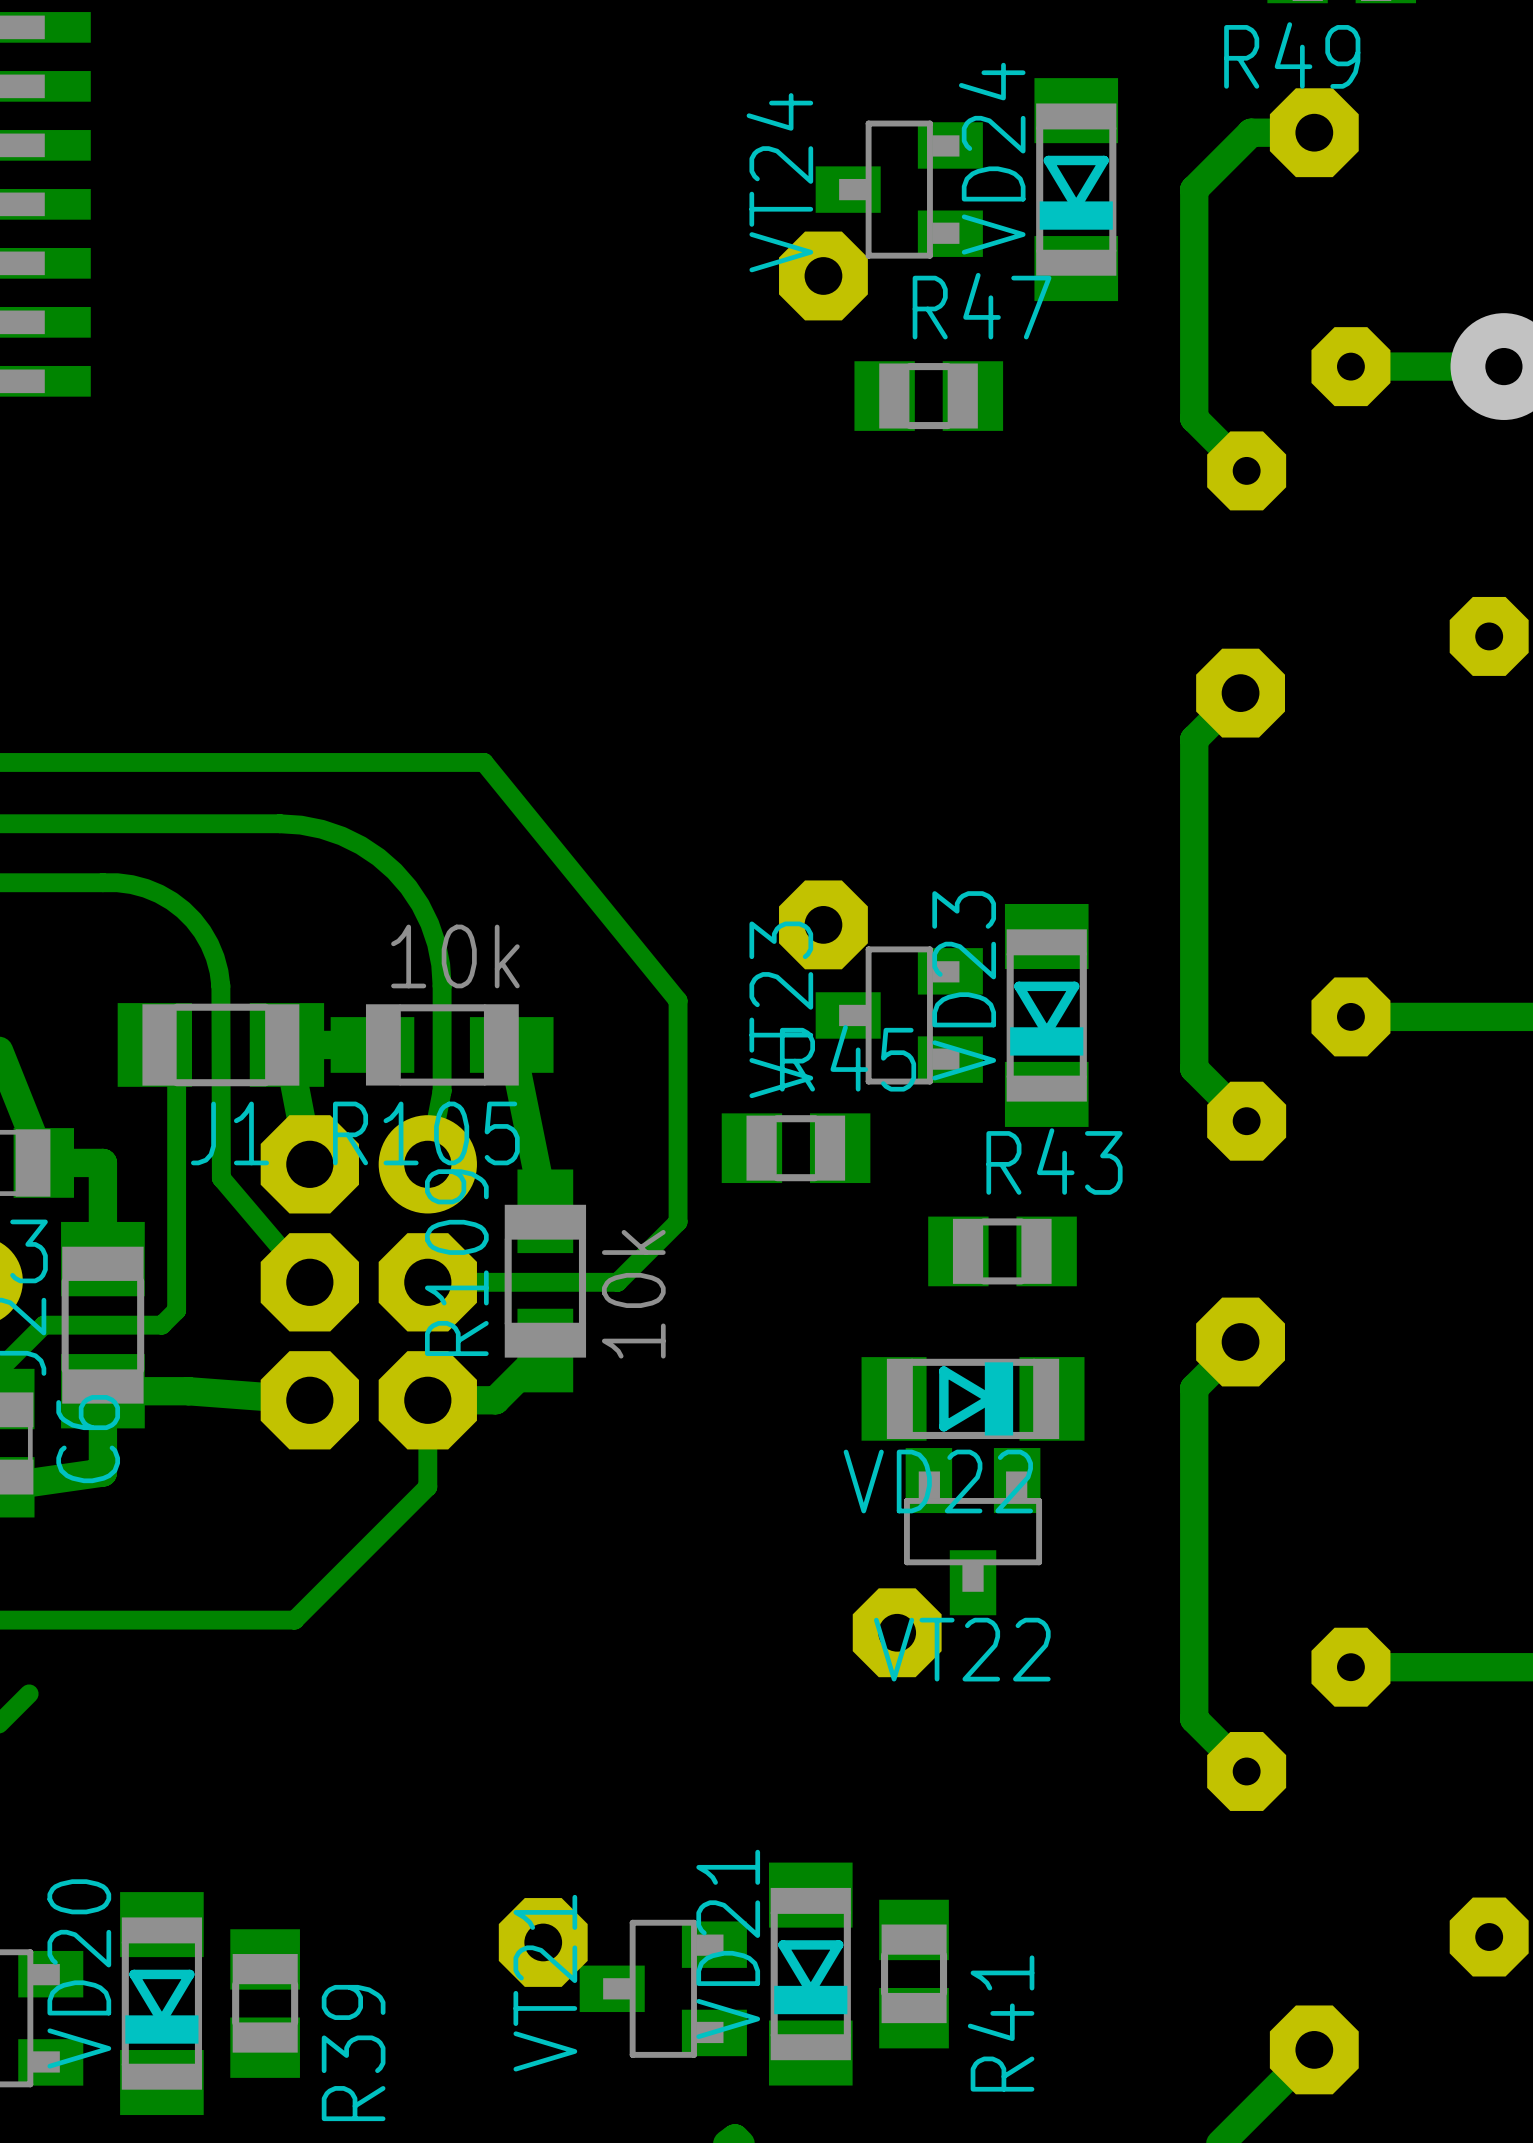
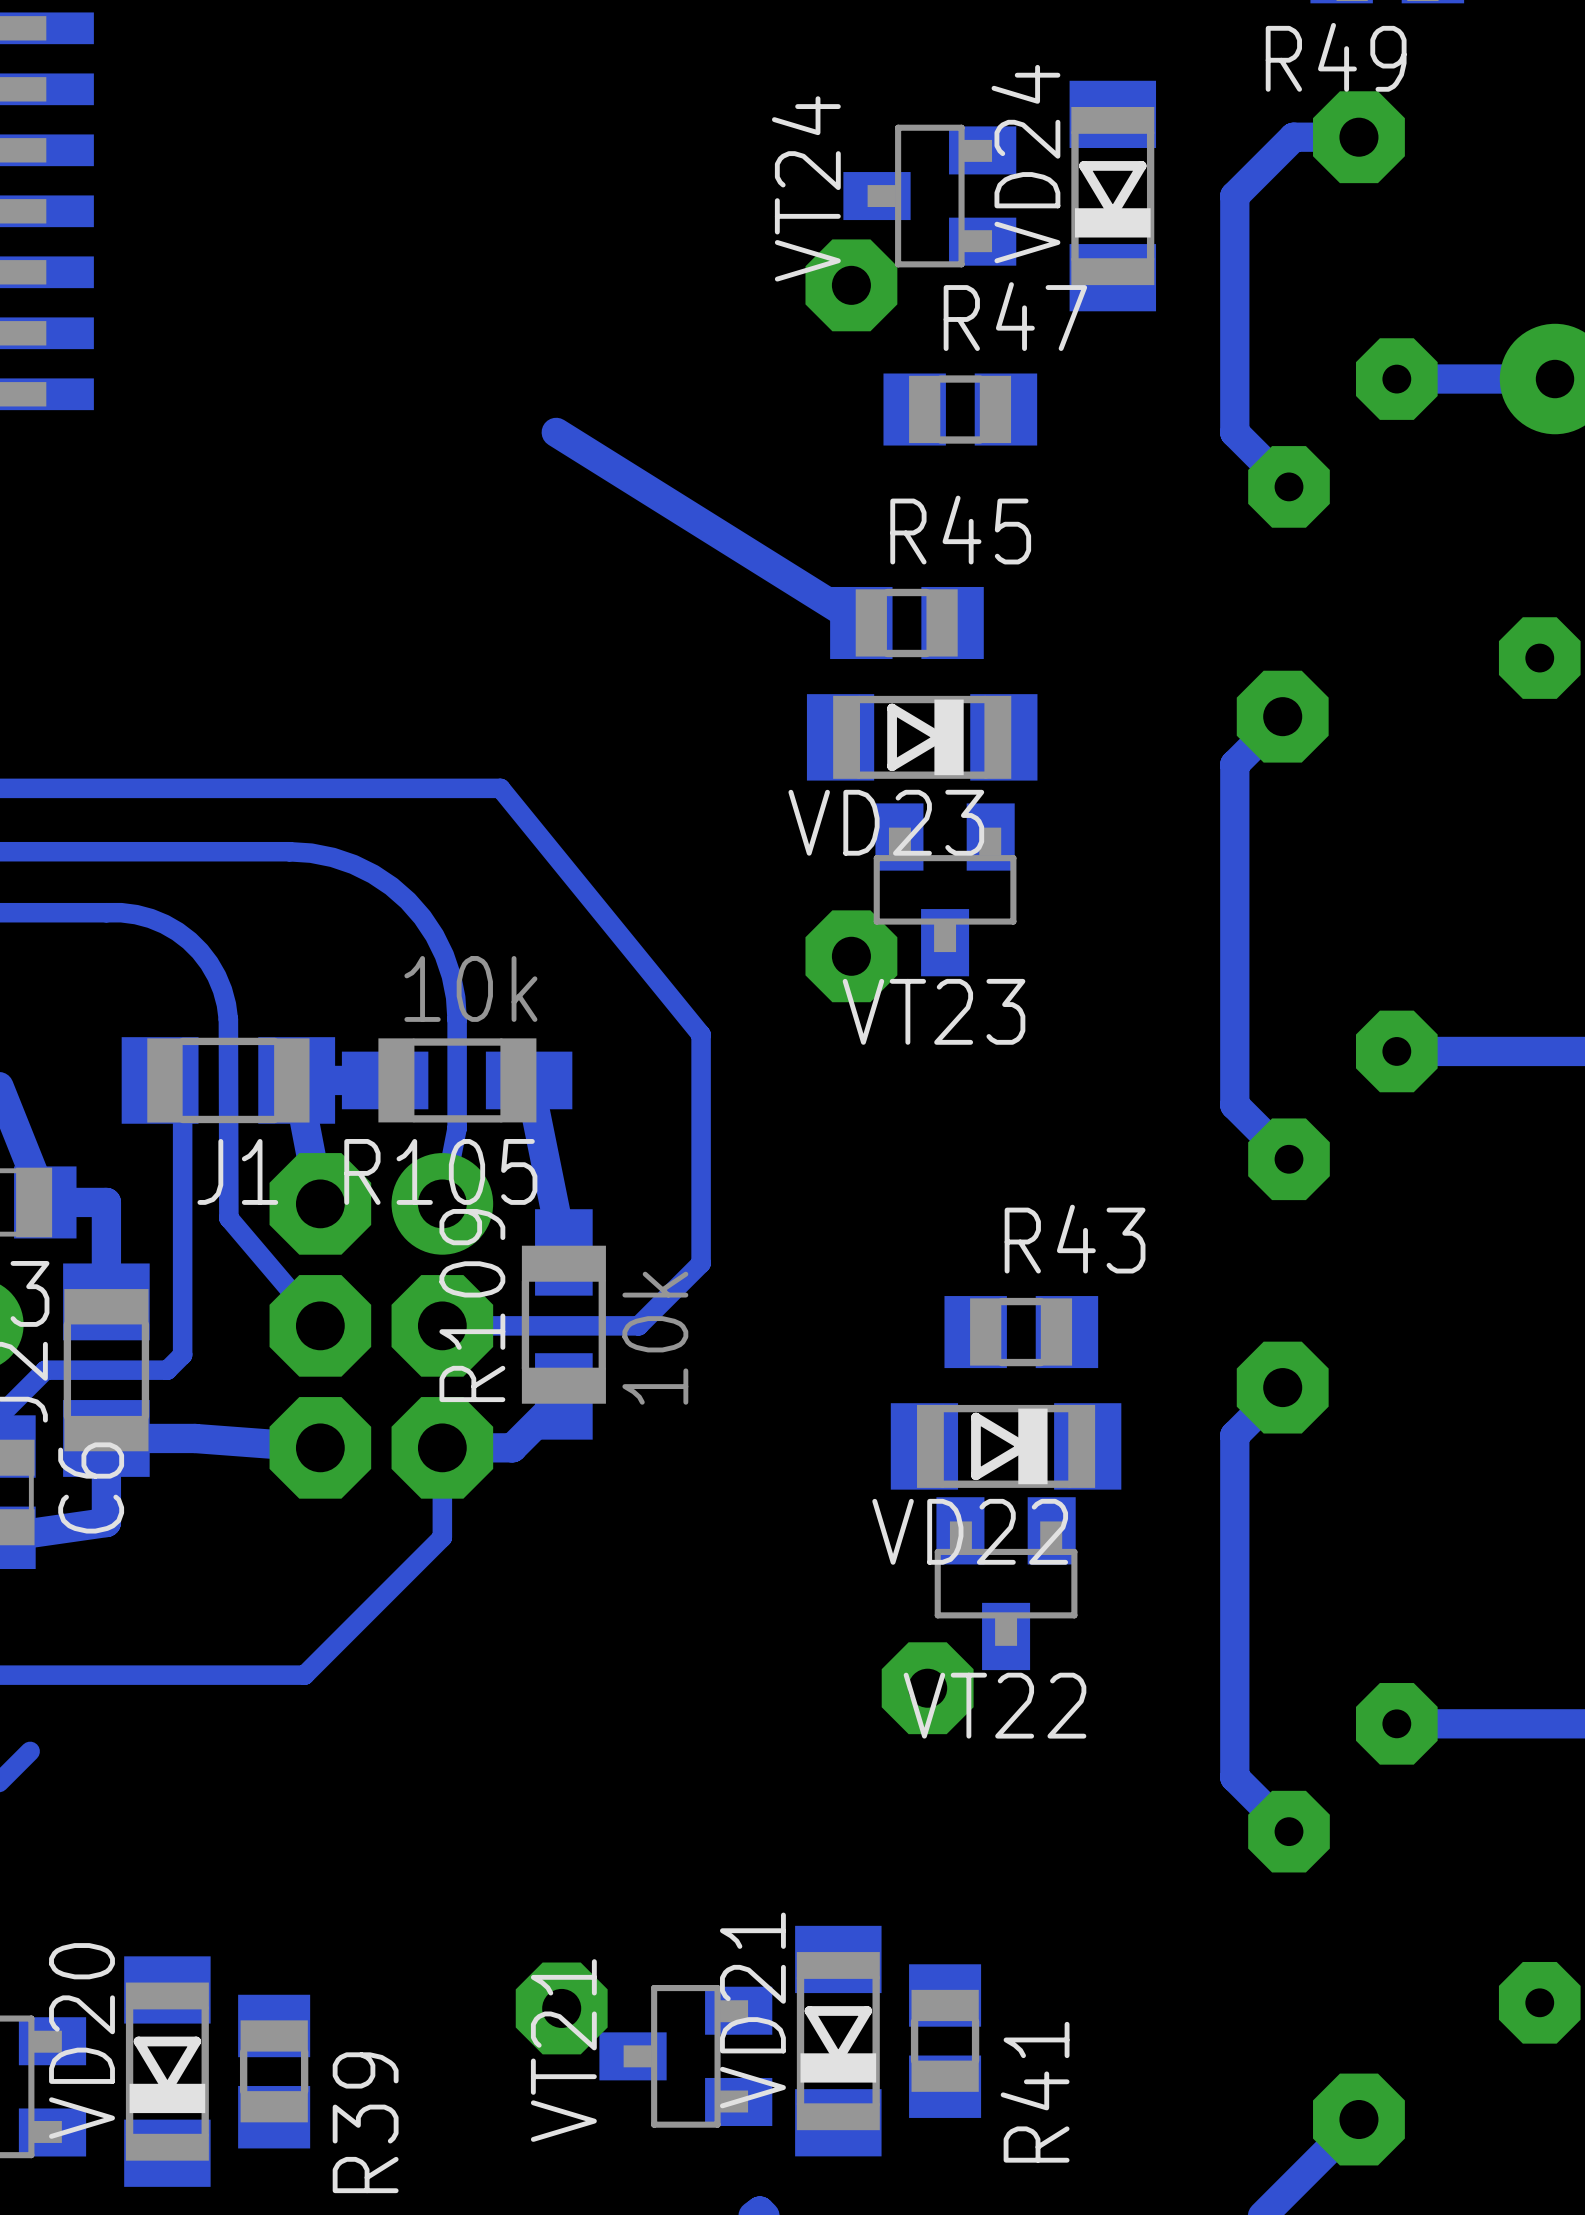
track: none -> (556, 432) (861, 622)
VT23 rotation: 0° (899, 1015) -> 90° counterclockwise (945, 889)
VT23 position: (899, 1015) -> (945, 889)
VD23 rotation: 0° (1046, 1015) -> 90° counterclockwise (922, 737)
VD23 position: (1046, 1015) -> (922, 737)
R45 position: (796, 1148) -> (906, 622)
R43 position: (1002, 1251) -> (1021, 1332)

